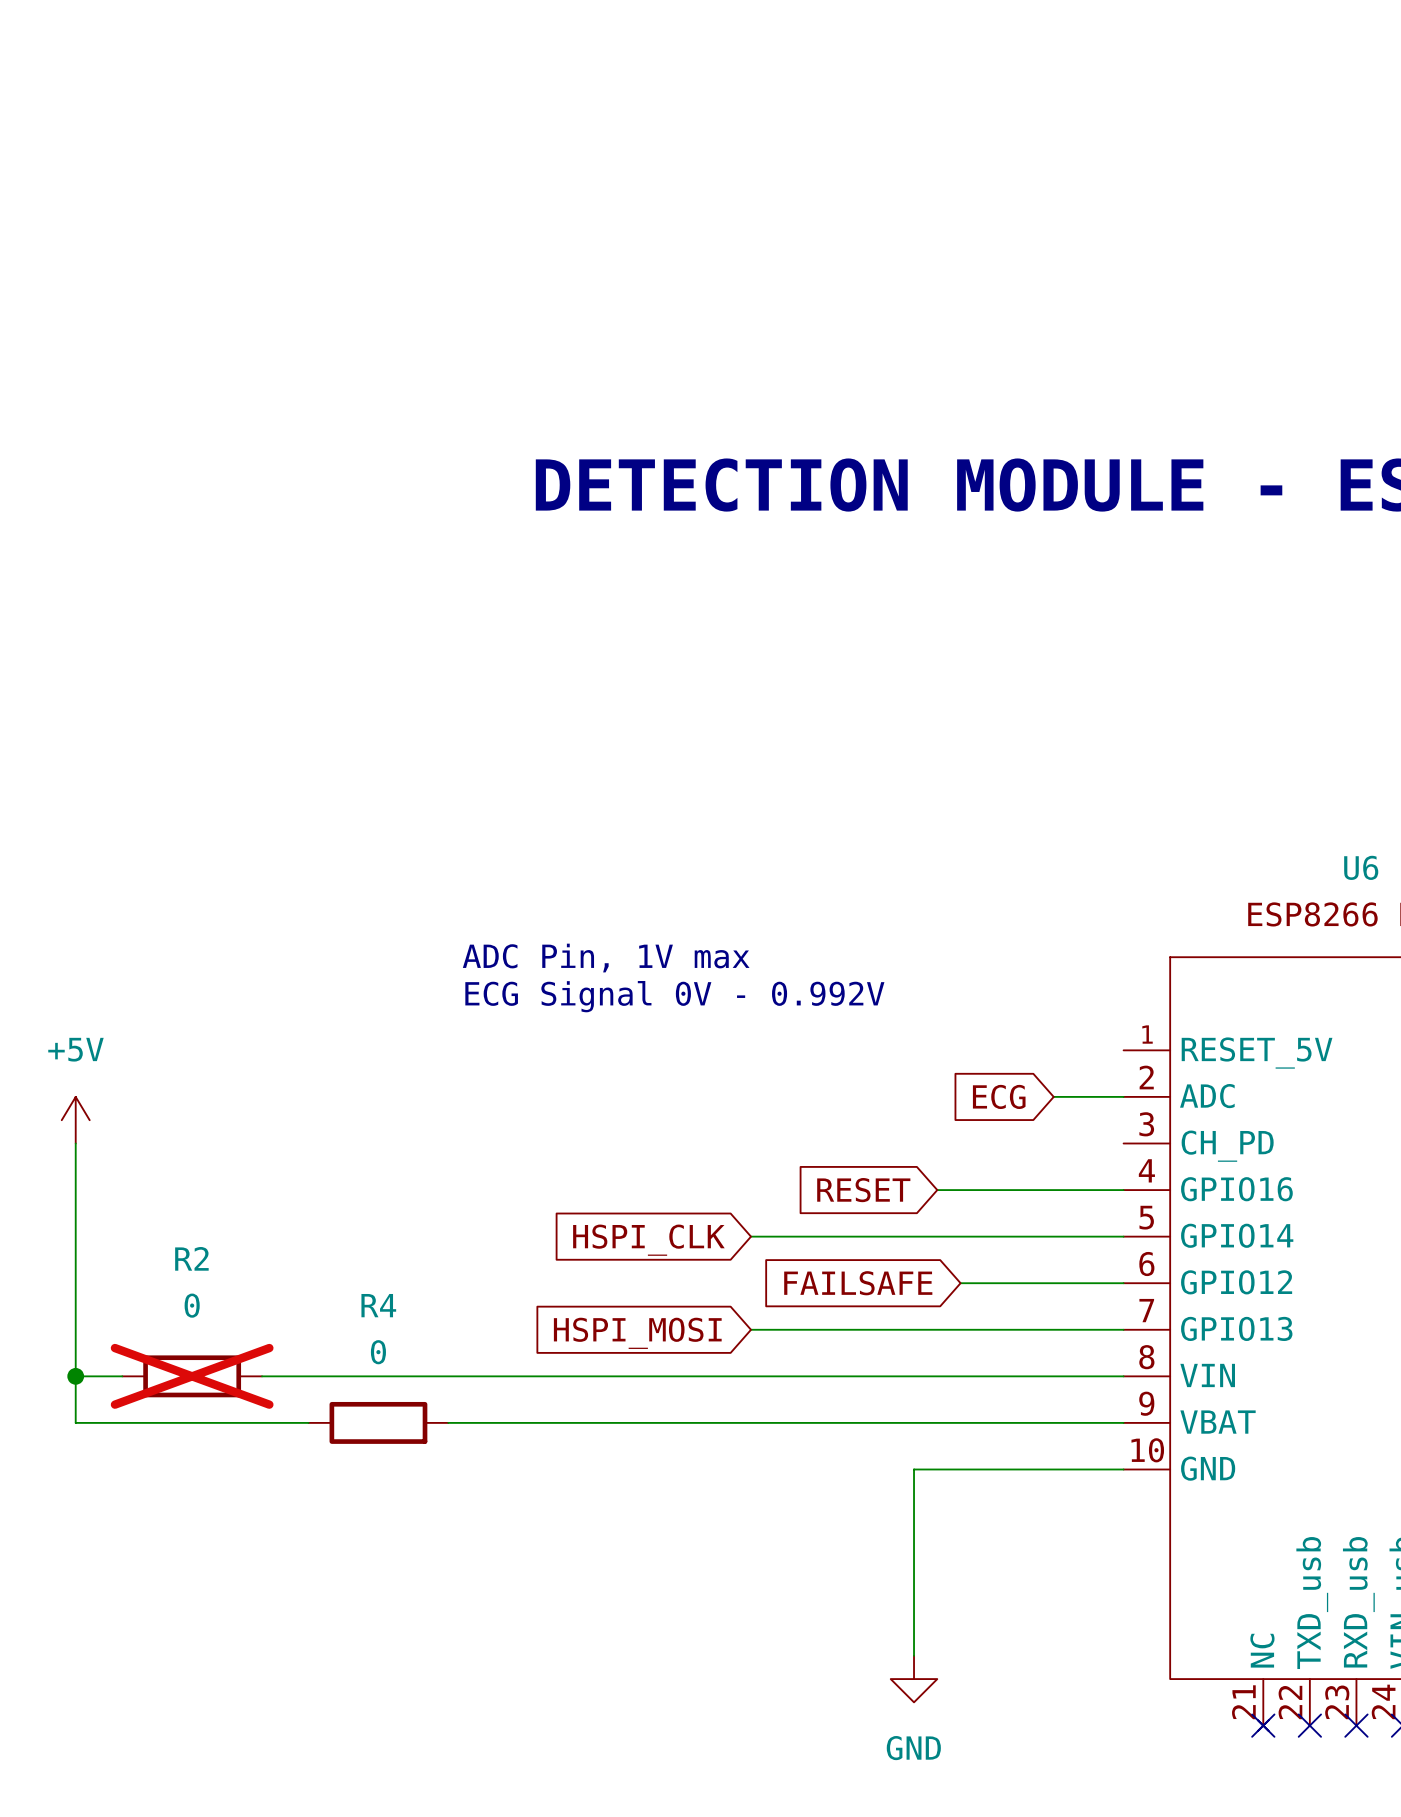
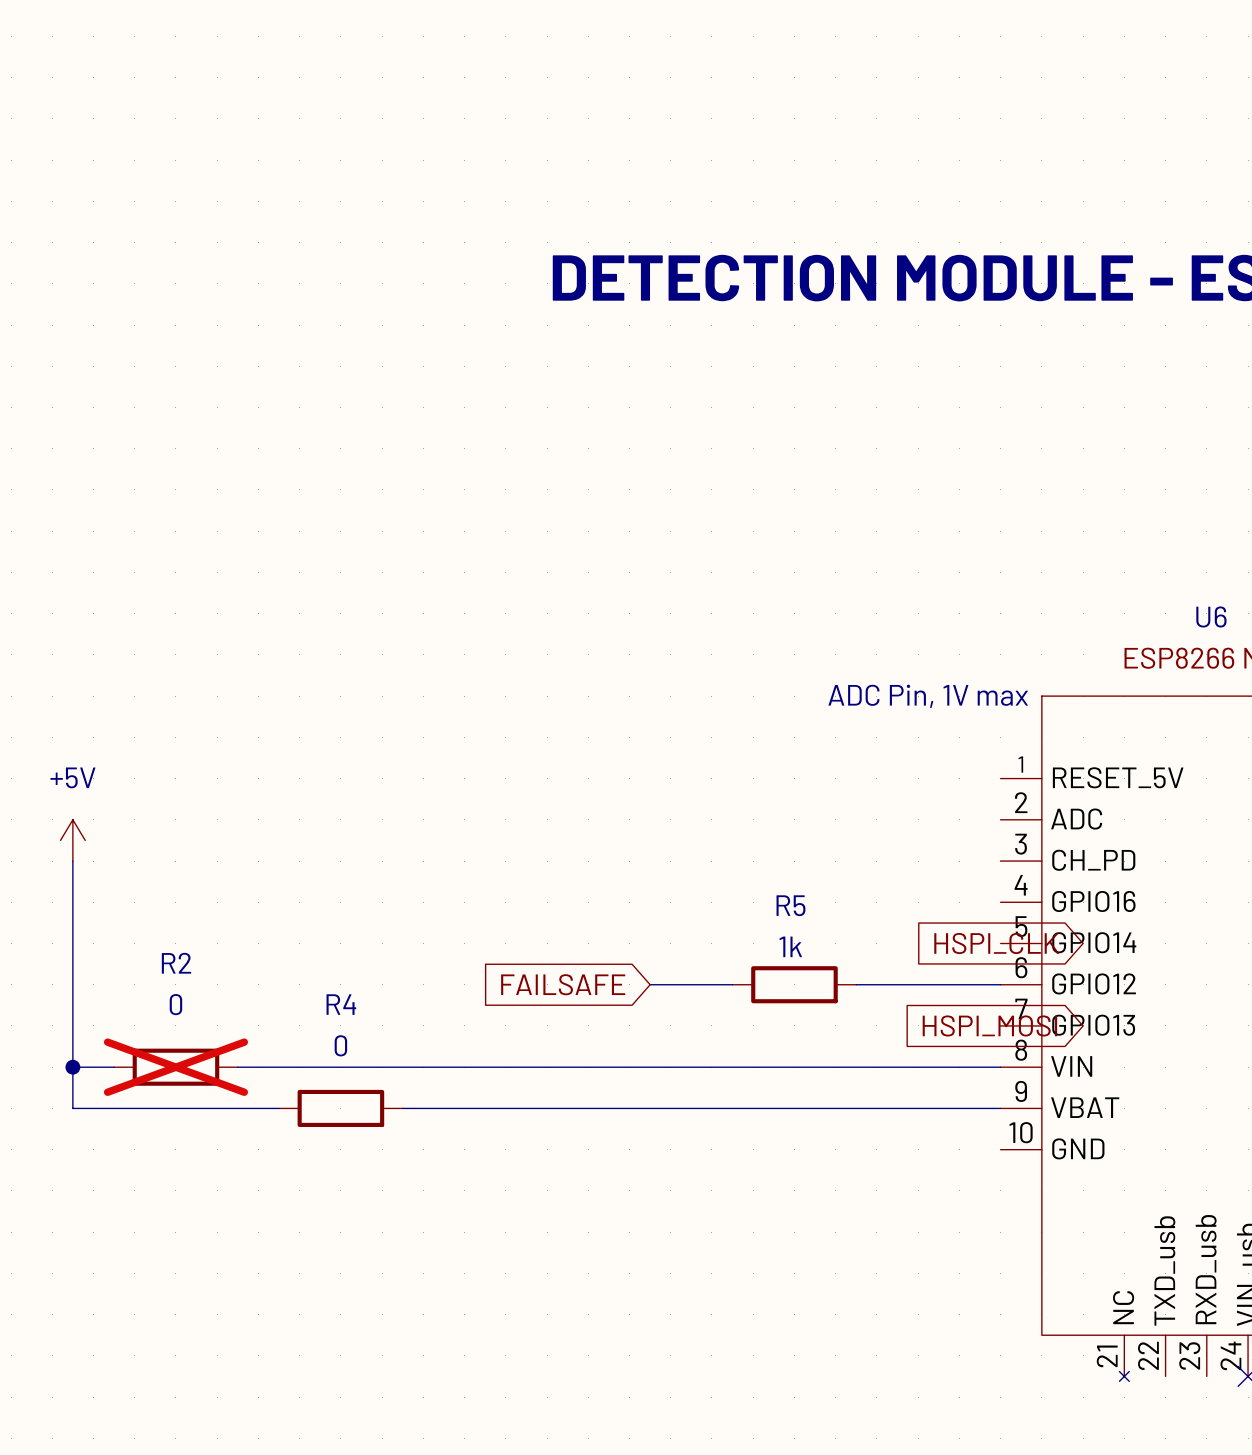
text: ADC Pin, 1V max (606, 958) -> none
text: none -> ADC Pin, 1V max (928, 696)
text: ECG Signal 0V - 0.992V (674, 996) -> none
global label: ECG (999, 1096) -> none
wire: (1053, 1096) (1123, 1096) -> none
global label: RESET (863, 1190) -> none
wire: (937, 1190) (1123, 1190) -> none
wire: (751, 1236) (1123, 1236) -> none
global label: HSPI_CLK (648, 1240) -> none
global label: none -> HSPI_CLK (996, 943)
wire: none -> (650, 984) (732, 984)
global label position: FAILSAFE (858, 1283) -> FAILSAFE (563, 984)
R5: none -> 1k (794, 984)
wire: (751, 1329) (1123, 1329) -> none
global label: HSPI_MOSI (637, 1333) -> none
global label: none -> HSPI_MOSI (989, 1025)
wire: (1123, 1469) (914, 1469) (914, 1655) -> none
power symbol: GND (914, 1679) -> none
no-connect mark: (1263, 1725) -> none
no-connect mark: (1309, 1725) -> none
no-connect mark: (1356, 1725) -> none

